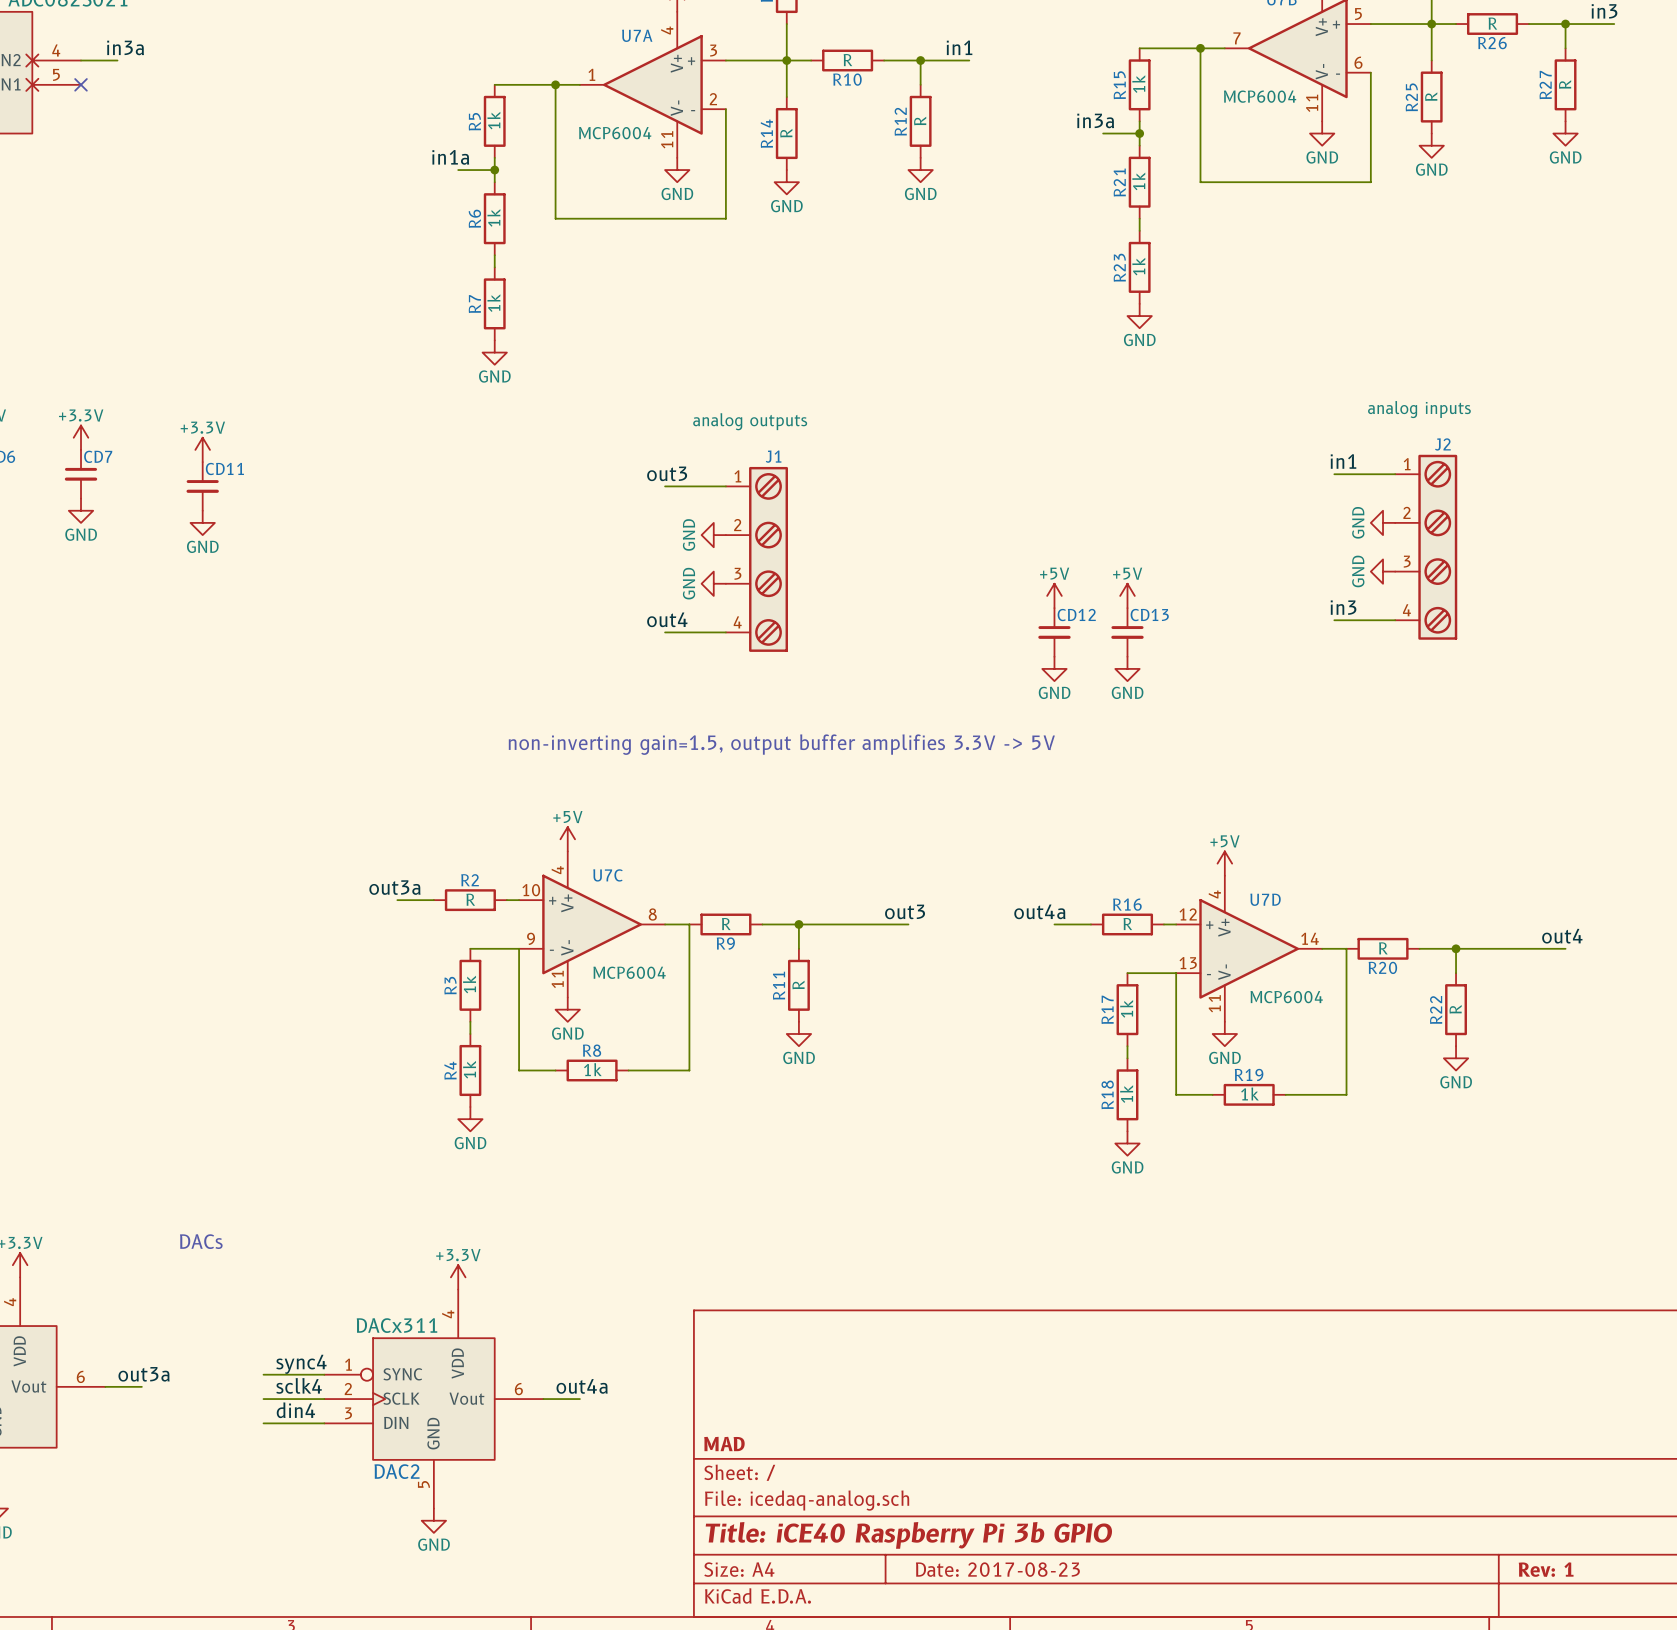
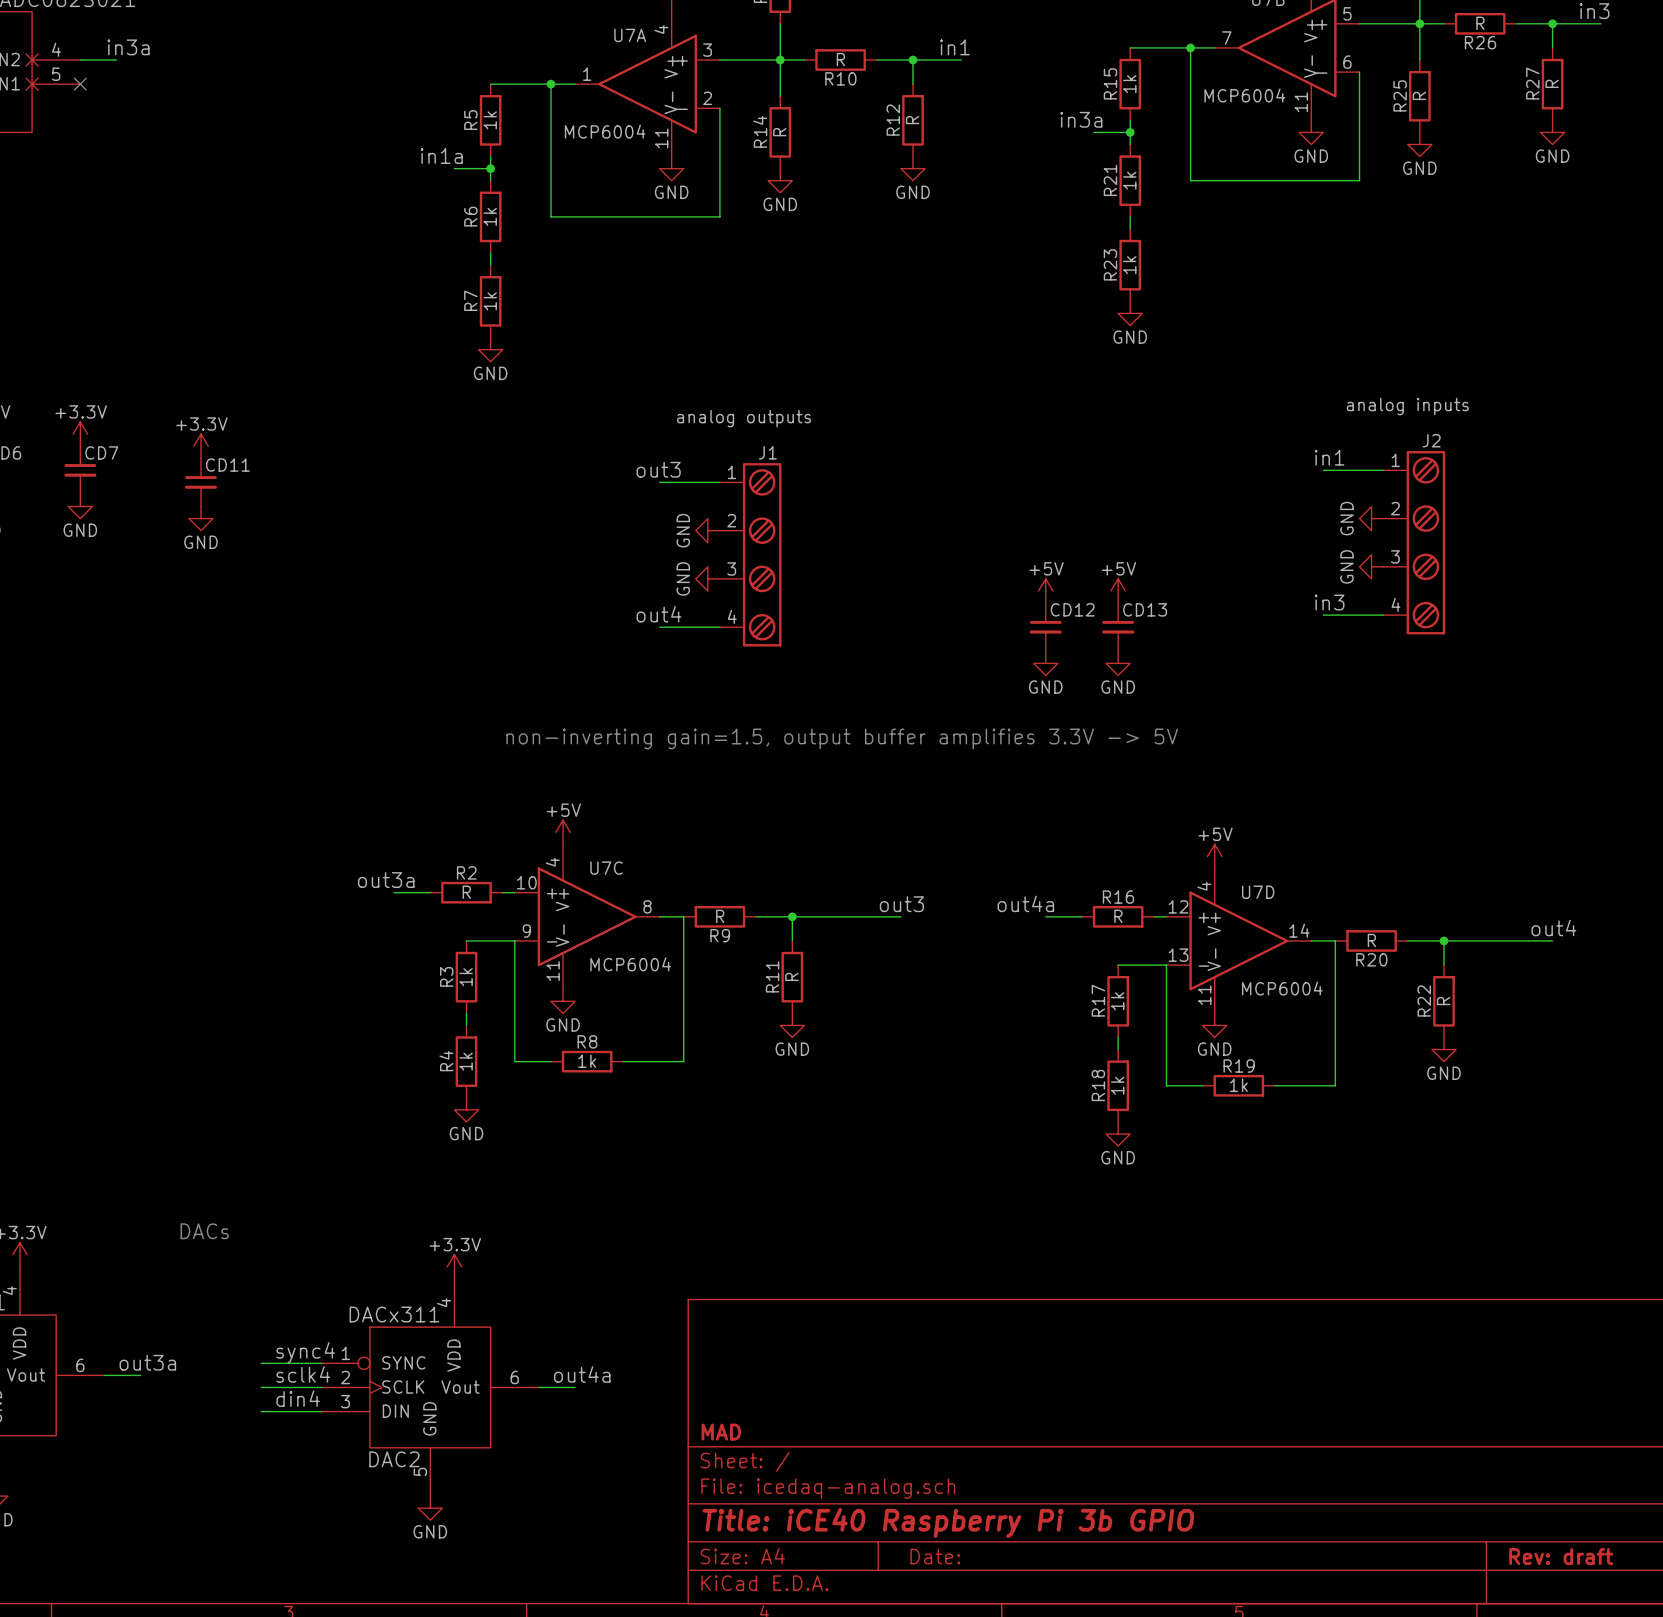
title block: Date: 2017-08-23 (997, 1569) -> Date: (935, 1556)
title block: Rev: 1 (1546, 1569) -> Rev: draft (1561, 1556)

